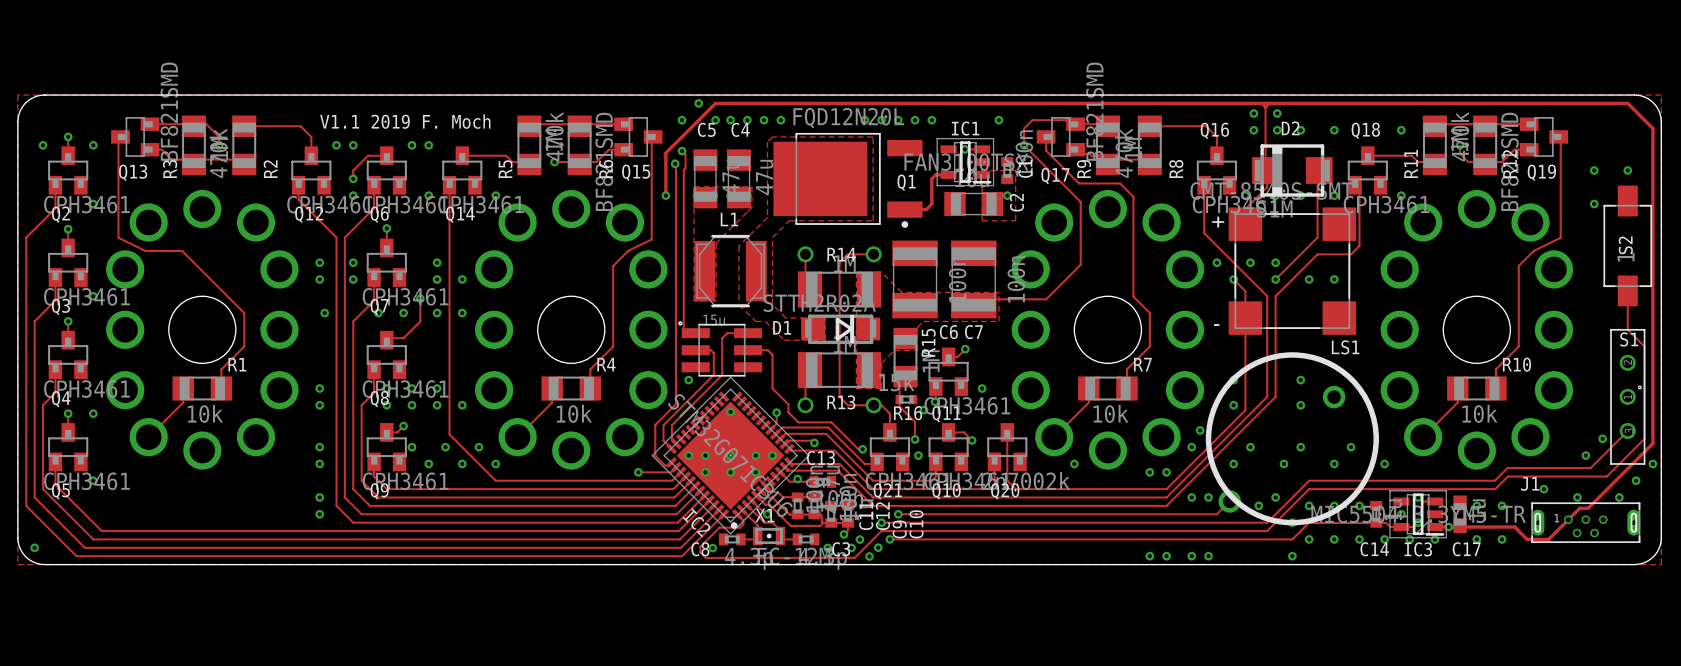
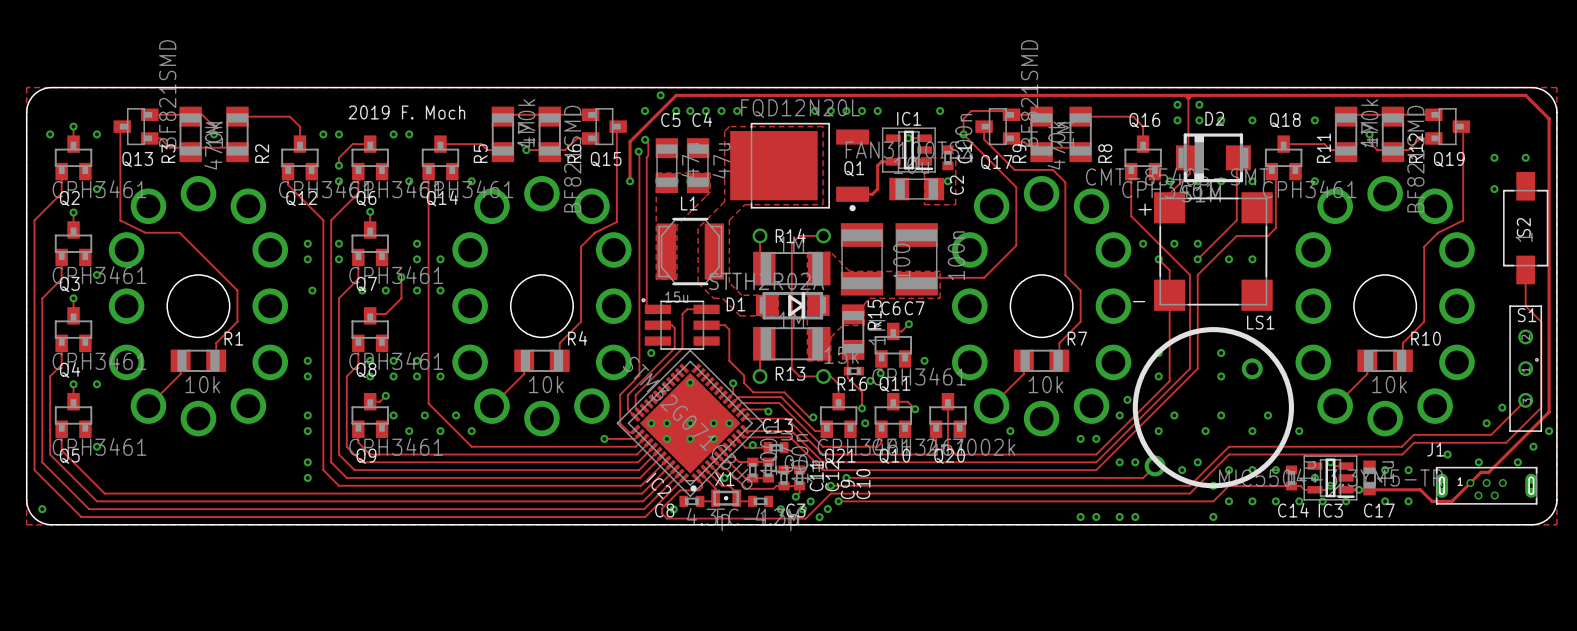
text: V1.1 2019 F. Moch (405, 121) -> 2019 F. Moch (406, 112)
track: (814, 514) (820, 514) (823, 523) -> none

